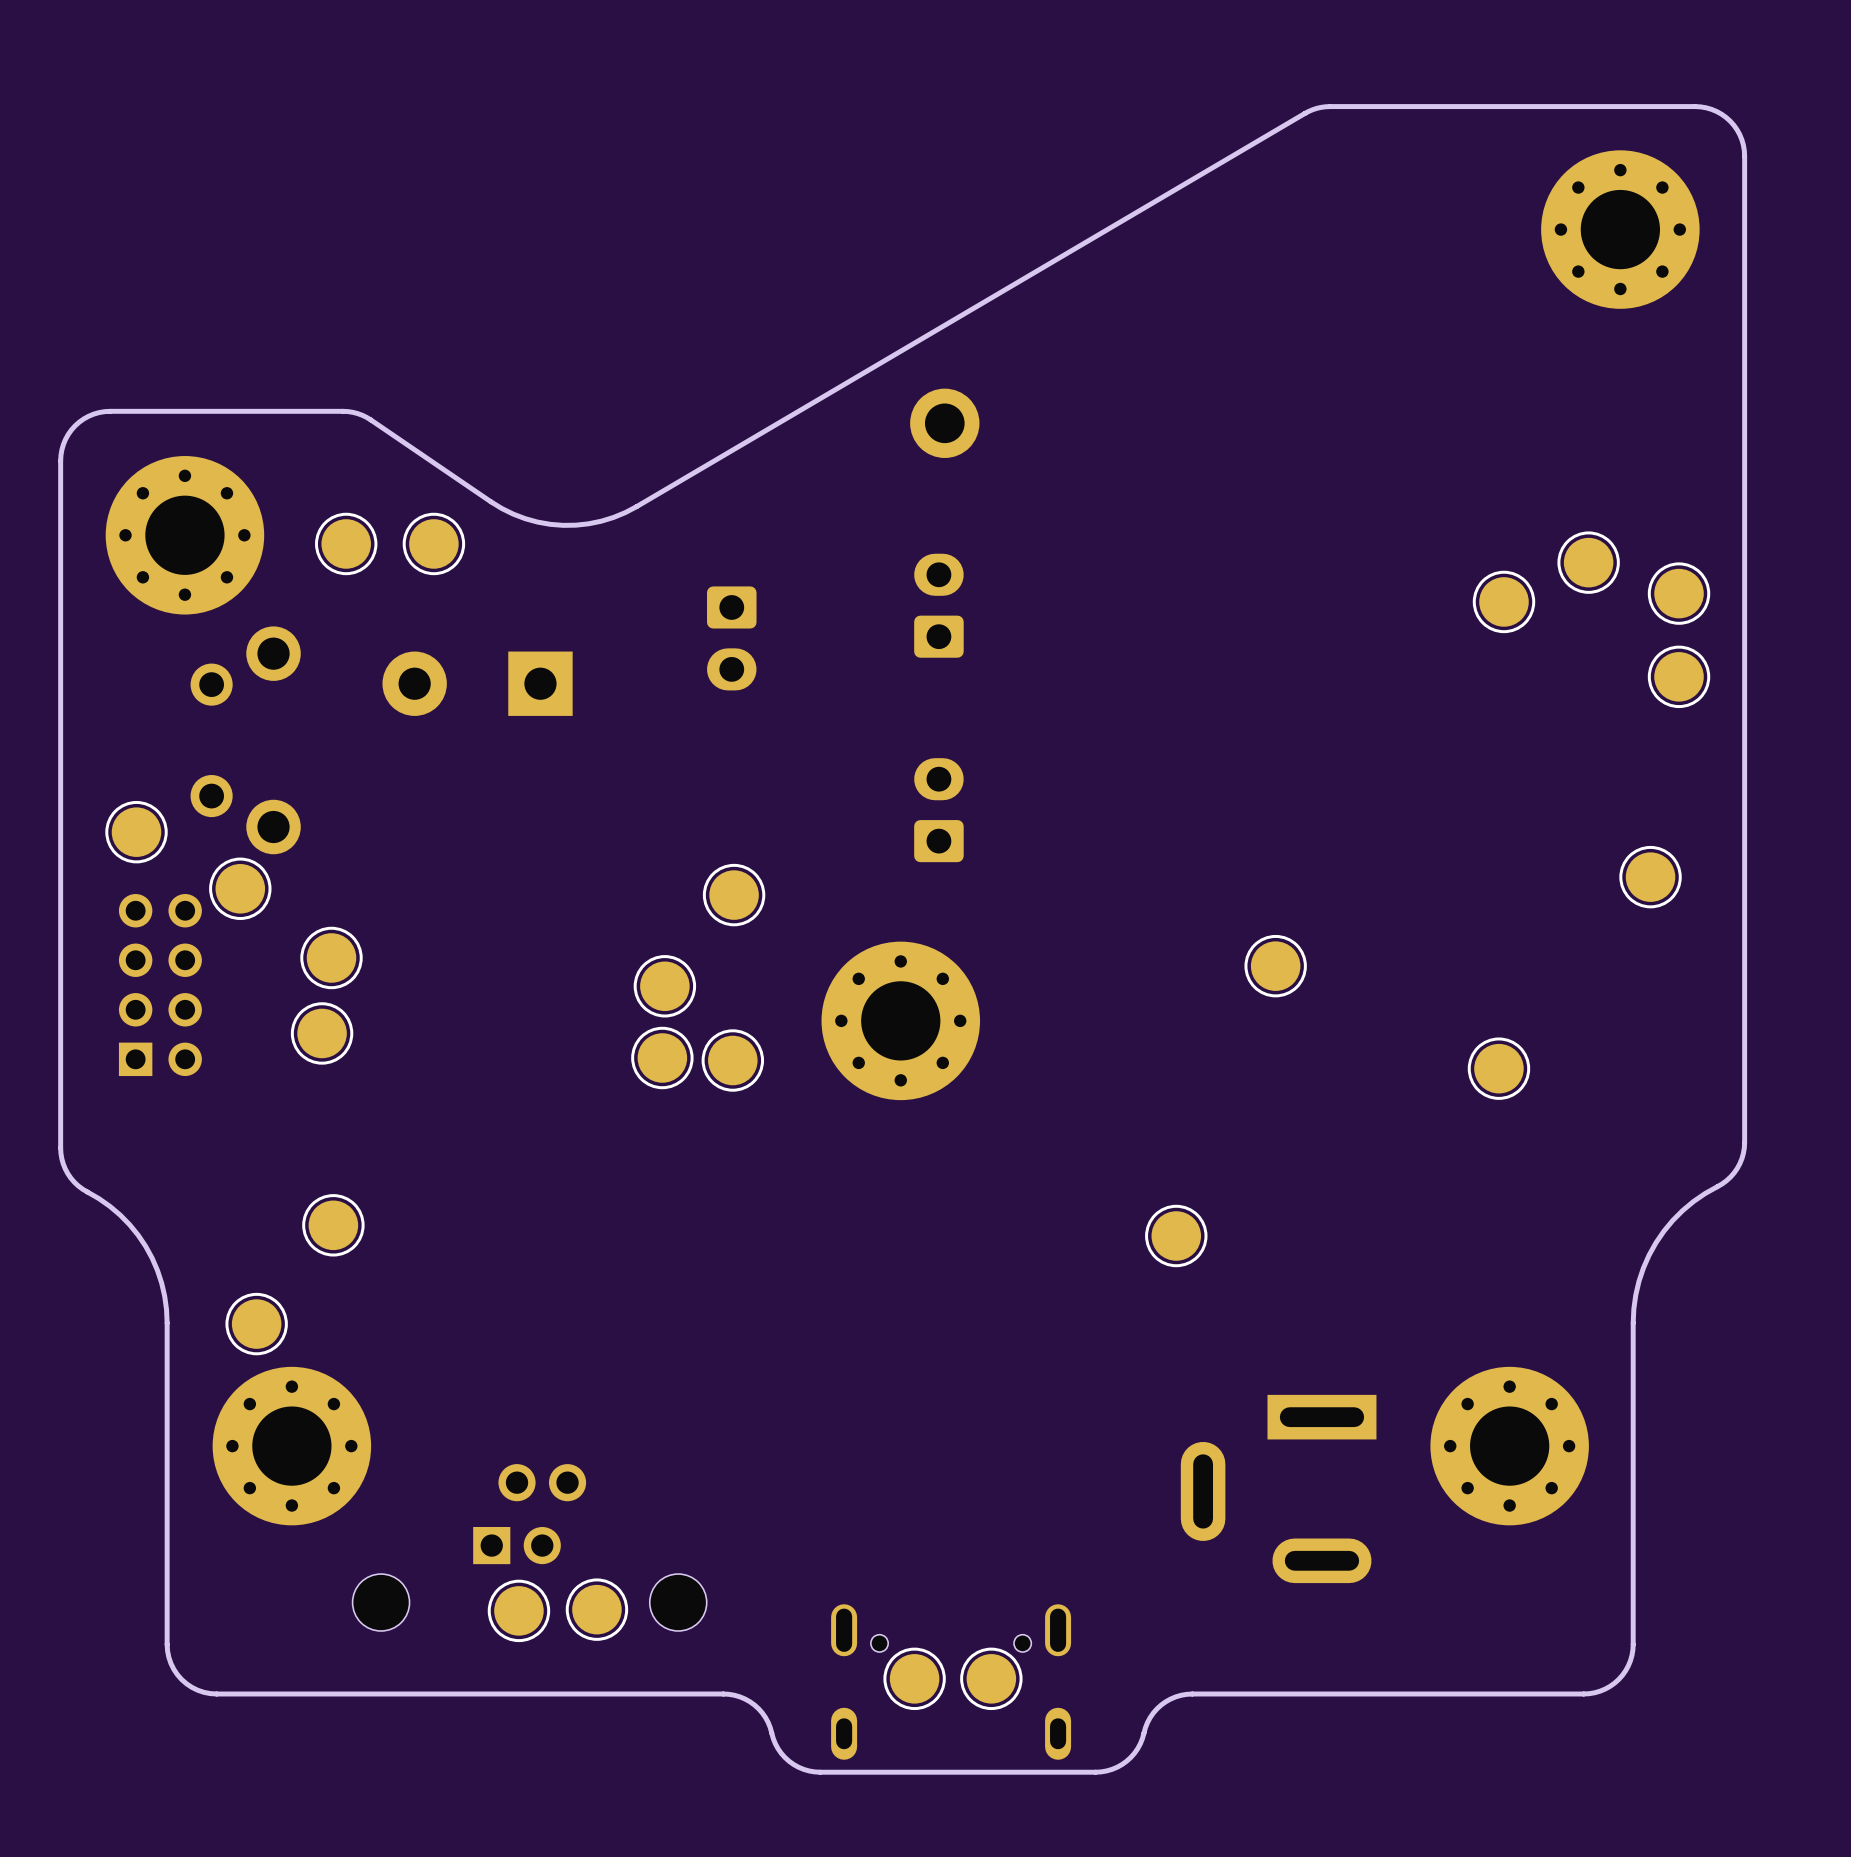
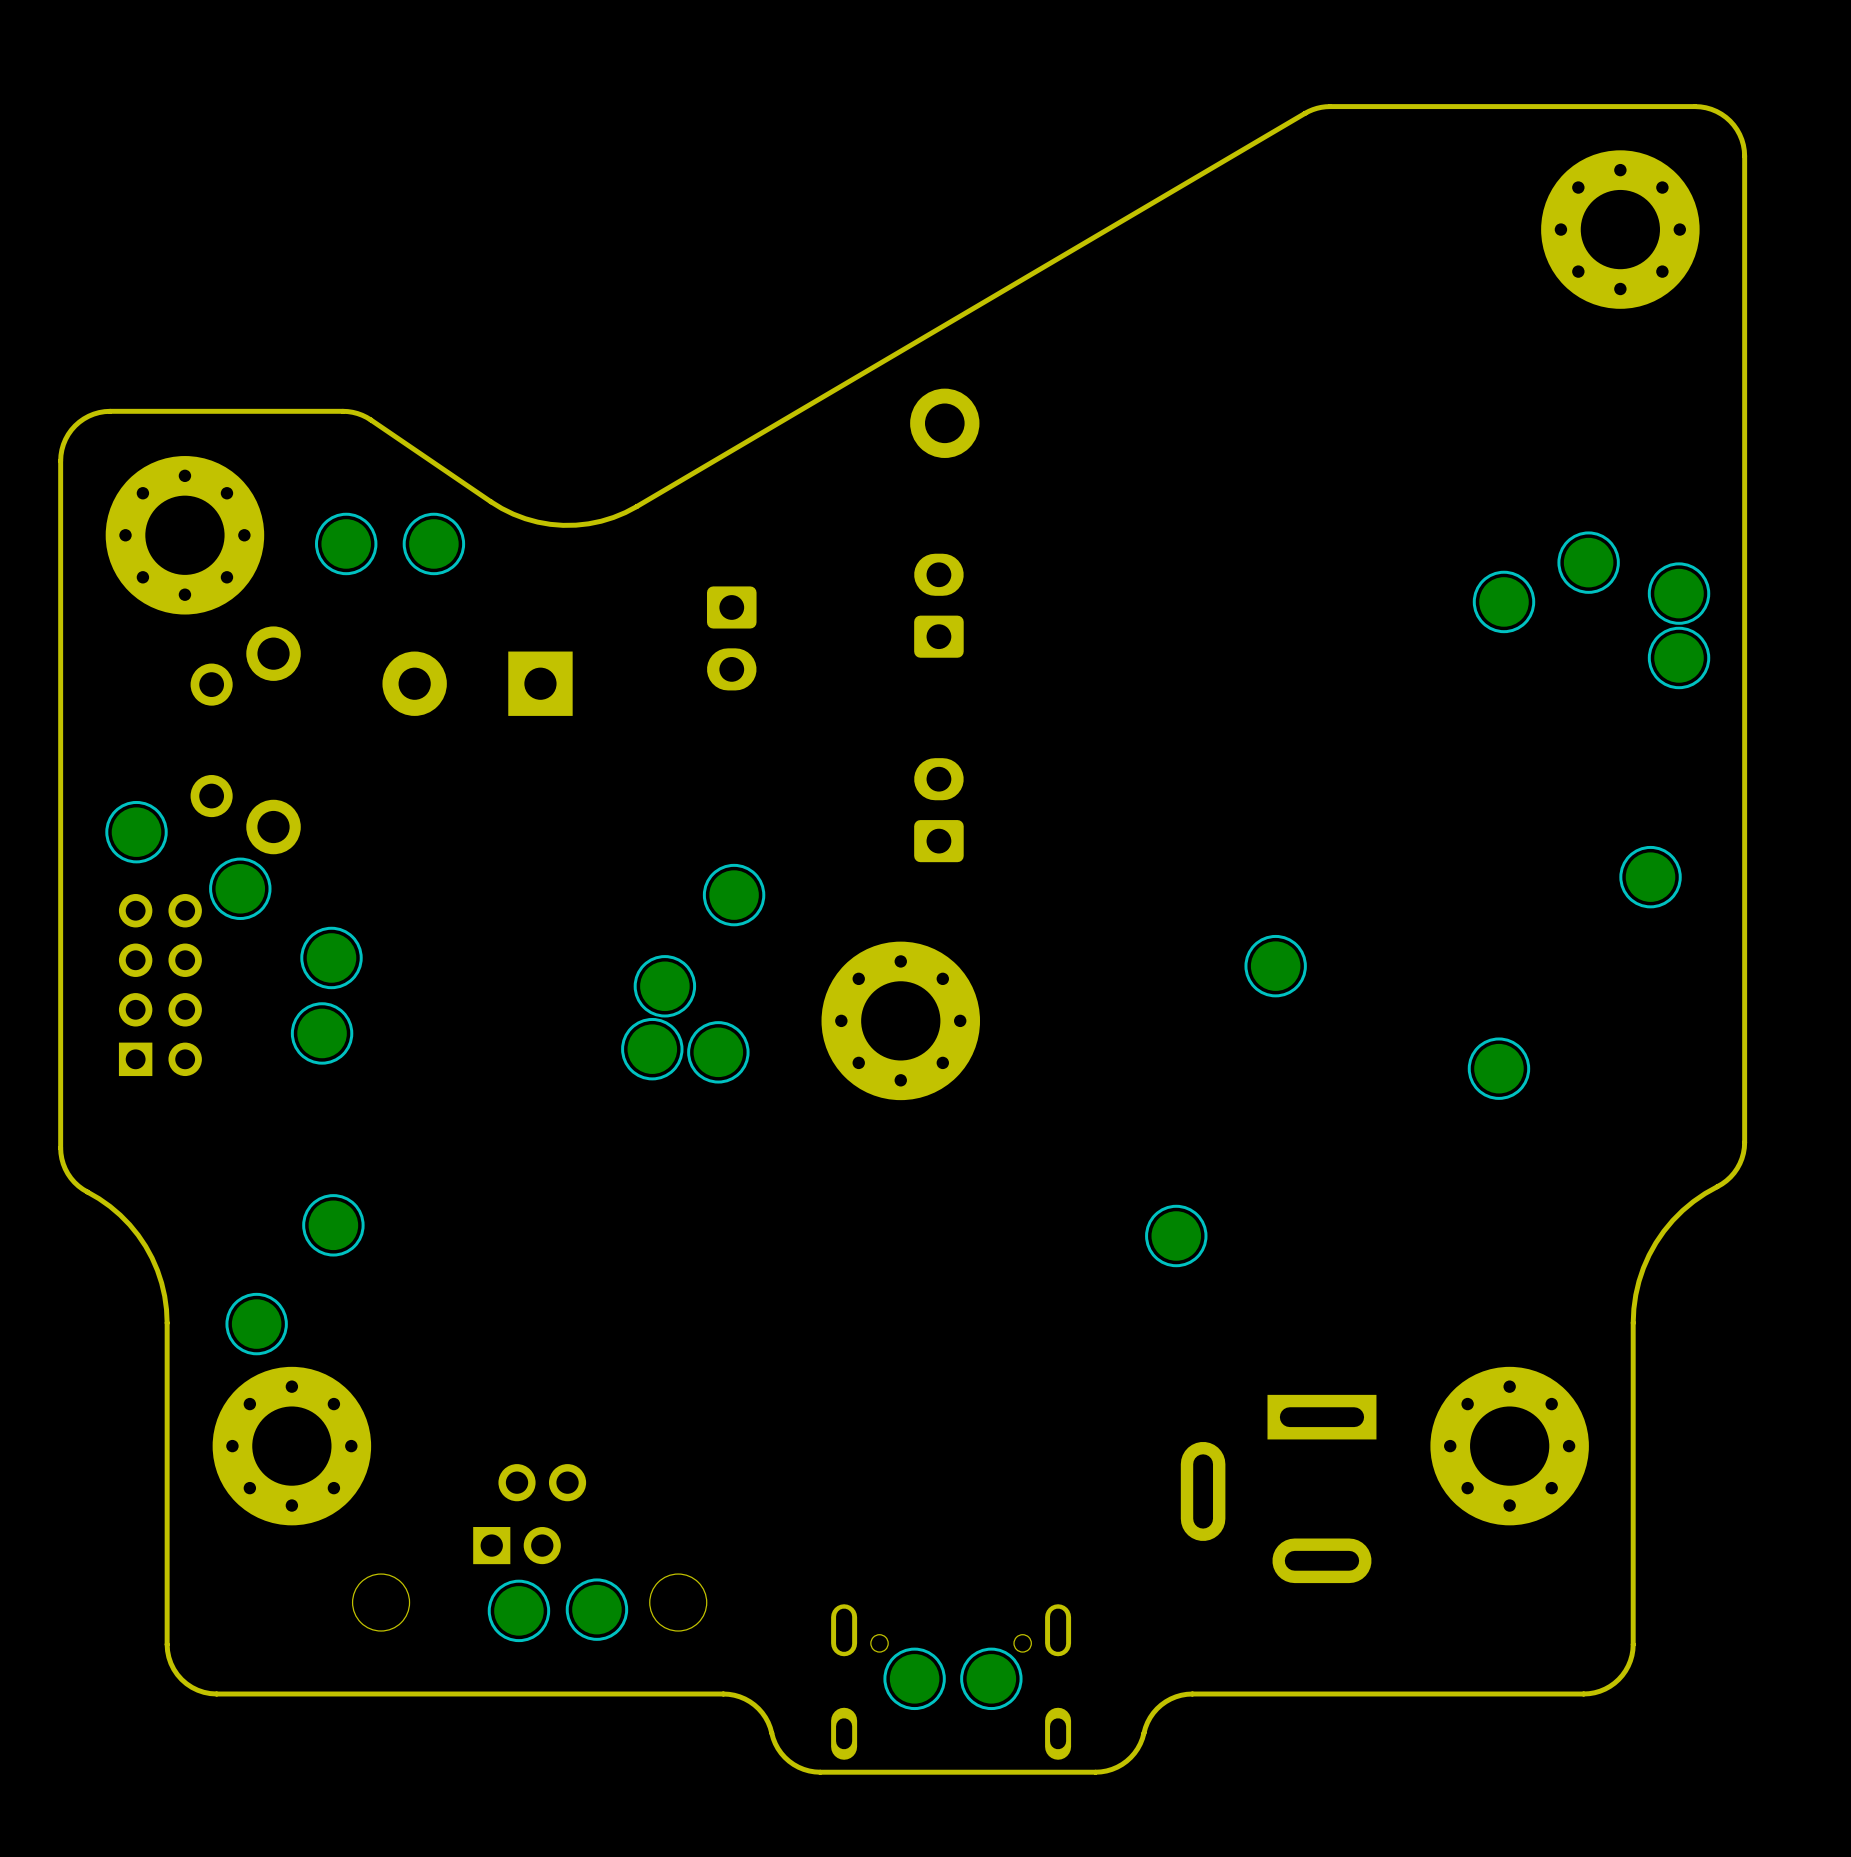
part position: (1679, 676) -> (1679, 657)
part position: (662, 1057) -> (652, 1049)
part position: (732, 1060) -> (718, 1052)

